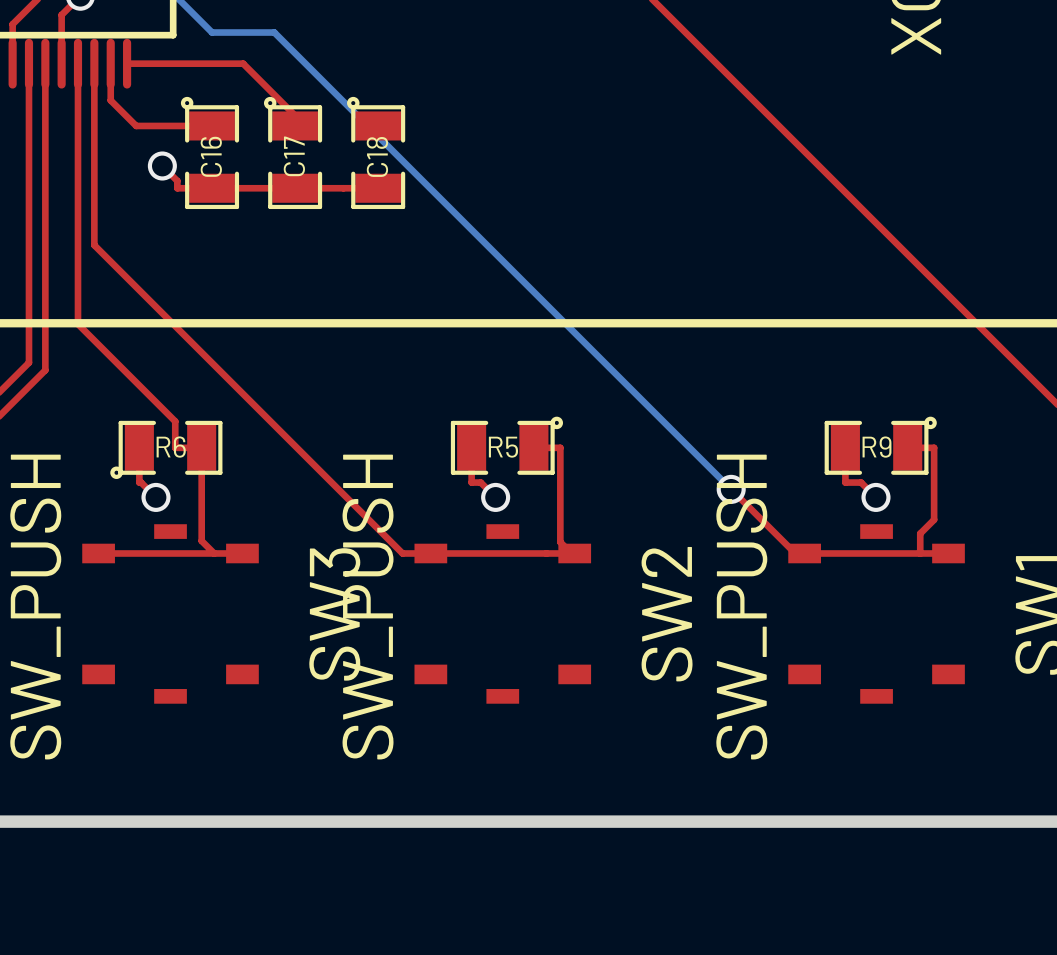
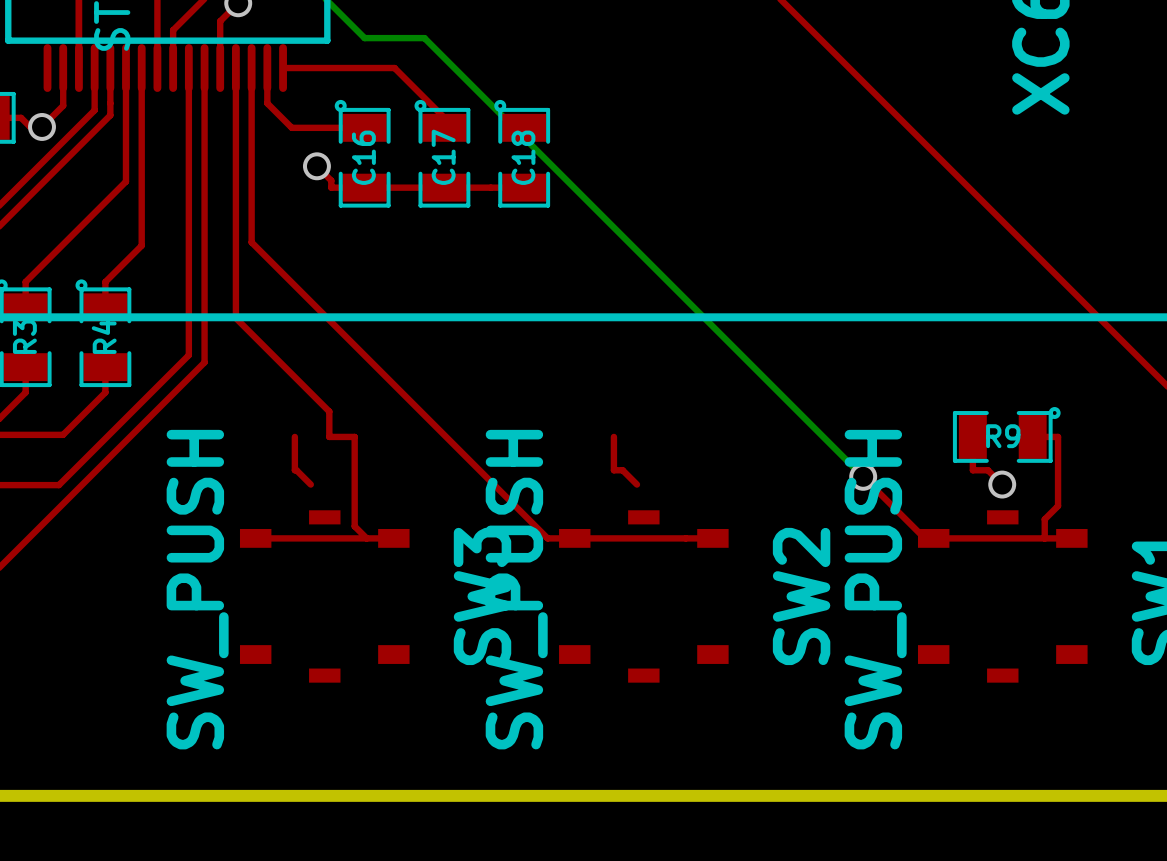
R5: (506, 445) -> none
top track: (533, 447) (560, 447) (560, 542) (571, 553) -> none
R6: (166, 449) -> none
via: (155, 497) -> none
via: (495, 497) -> none

